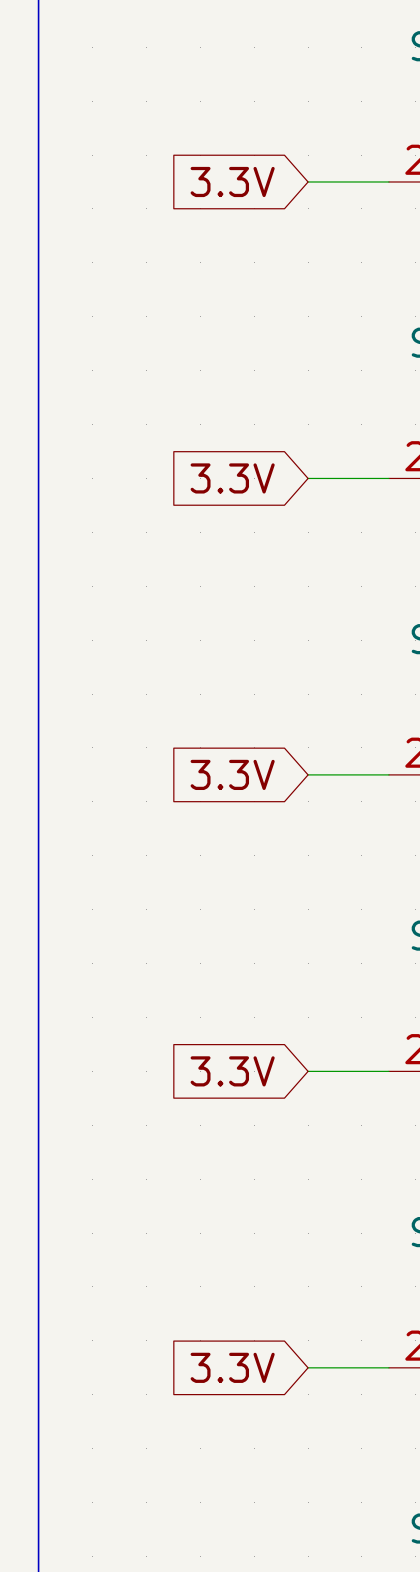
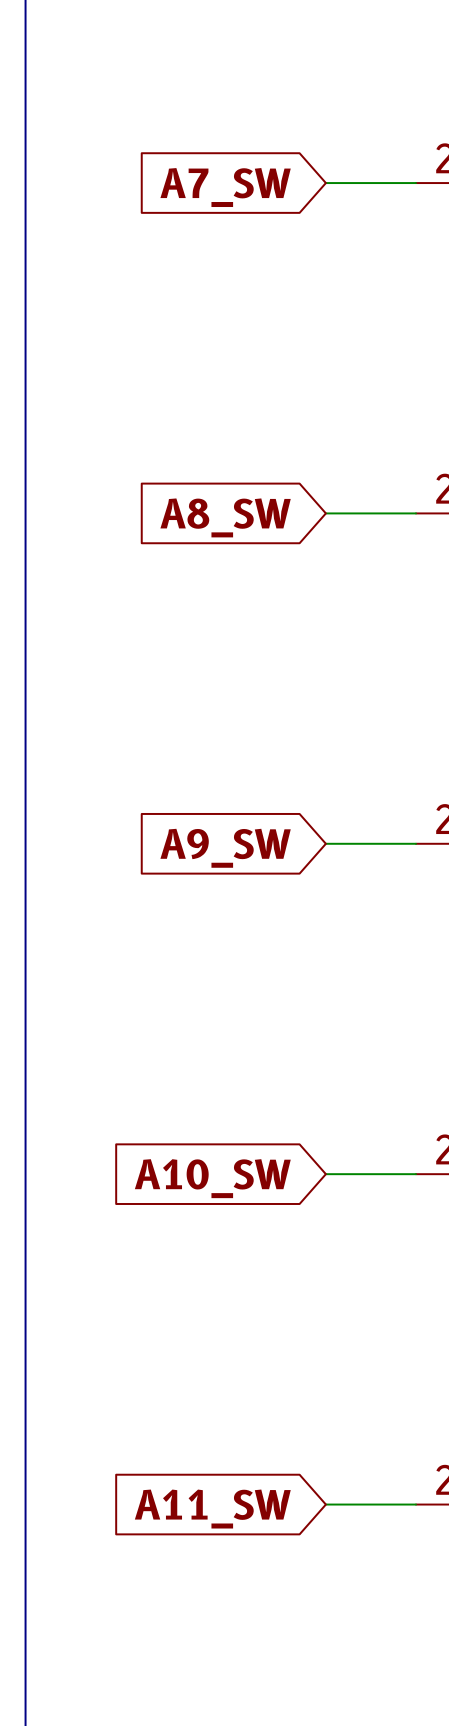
global label: 3.3V (232, 181) -> A7_SW (225, 187)
global label: 3.3V (232, 478) -> A8_SW (225, 517)
global label: 3.3V (232, 774) -> A9_SW (225, 848)
global label: 3.3V (232, 1071) -> A10_SW (212, 1178)
global label: 3.3V (232, 1367) -> A11_SW (212, 1509)

